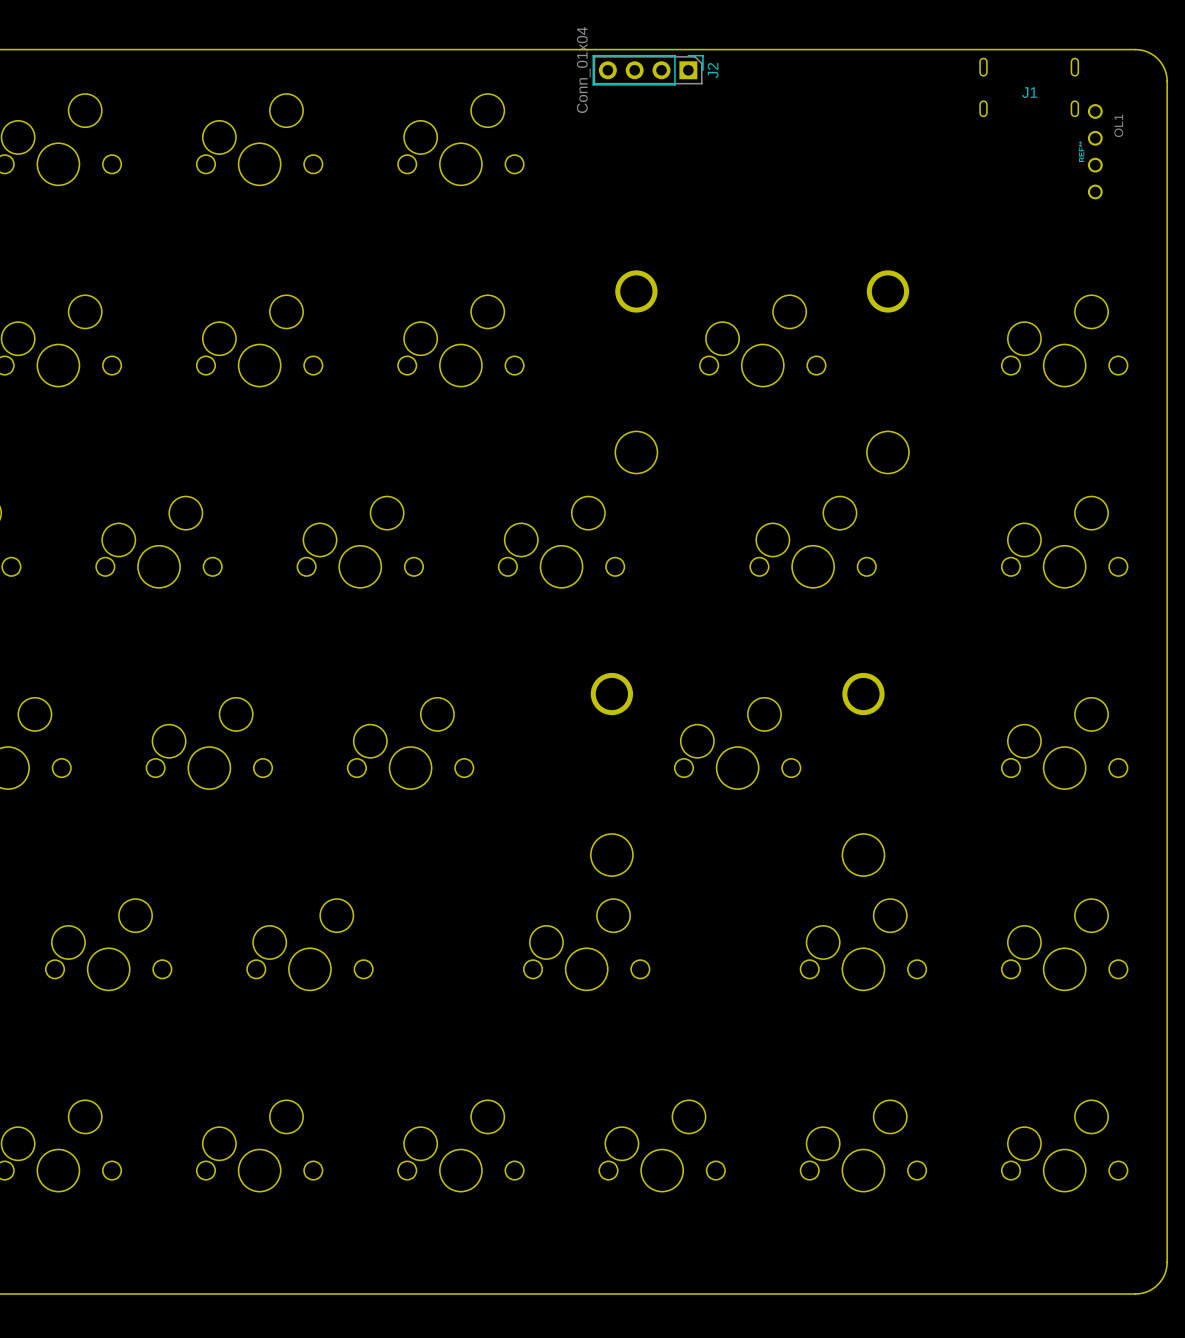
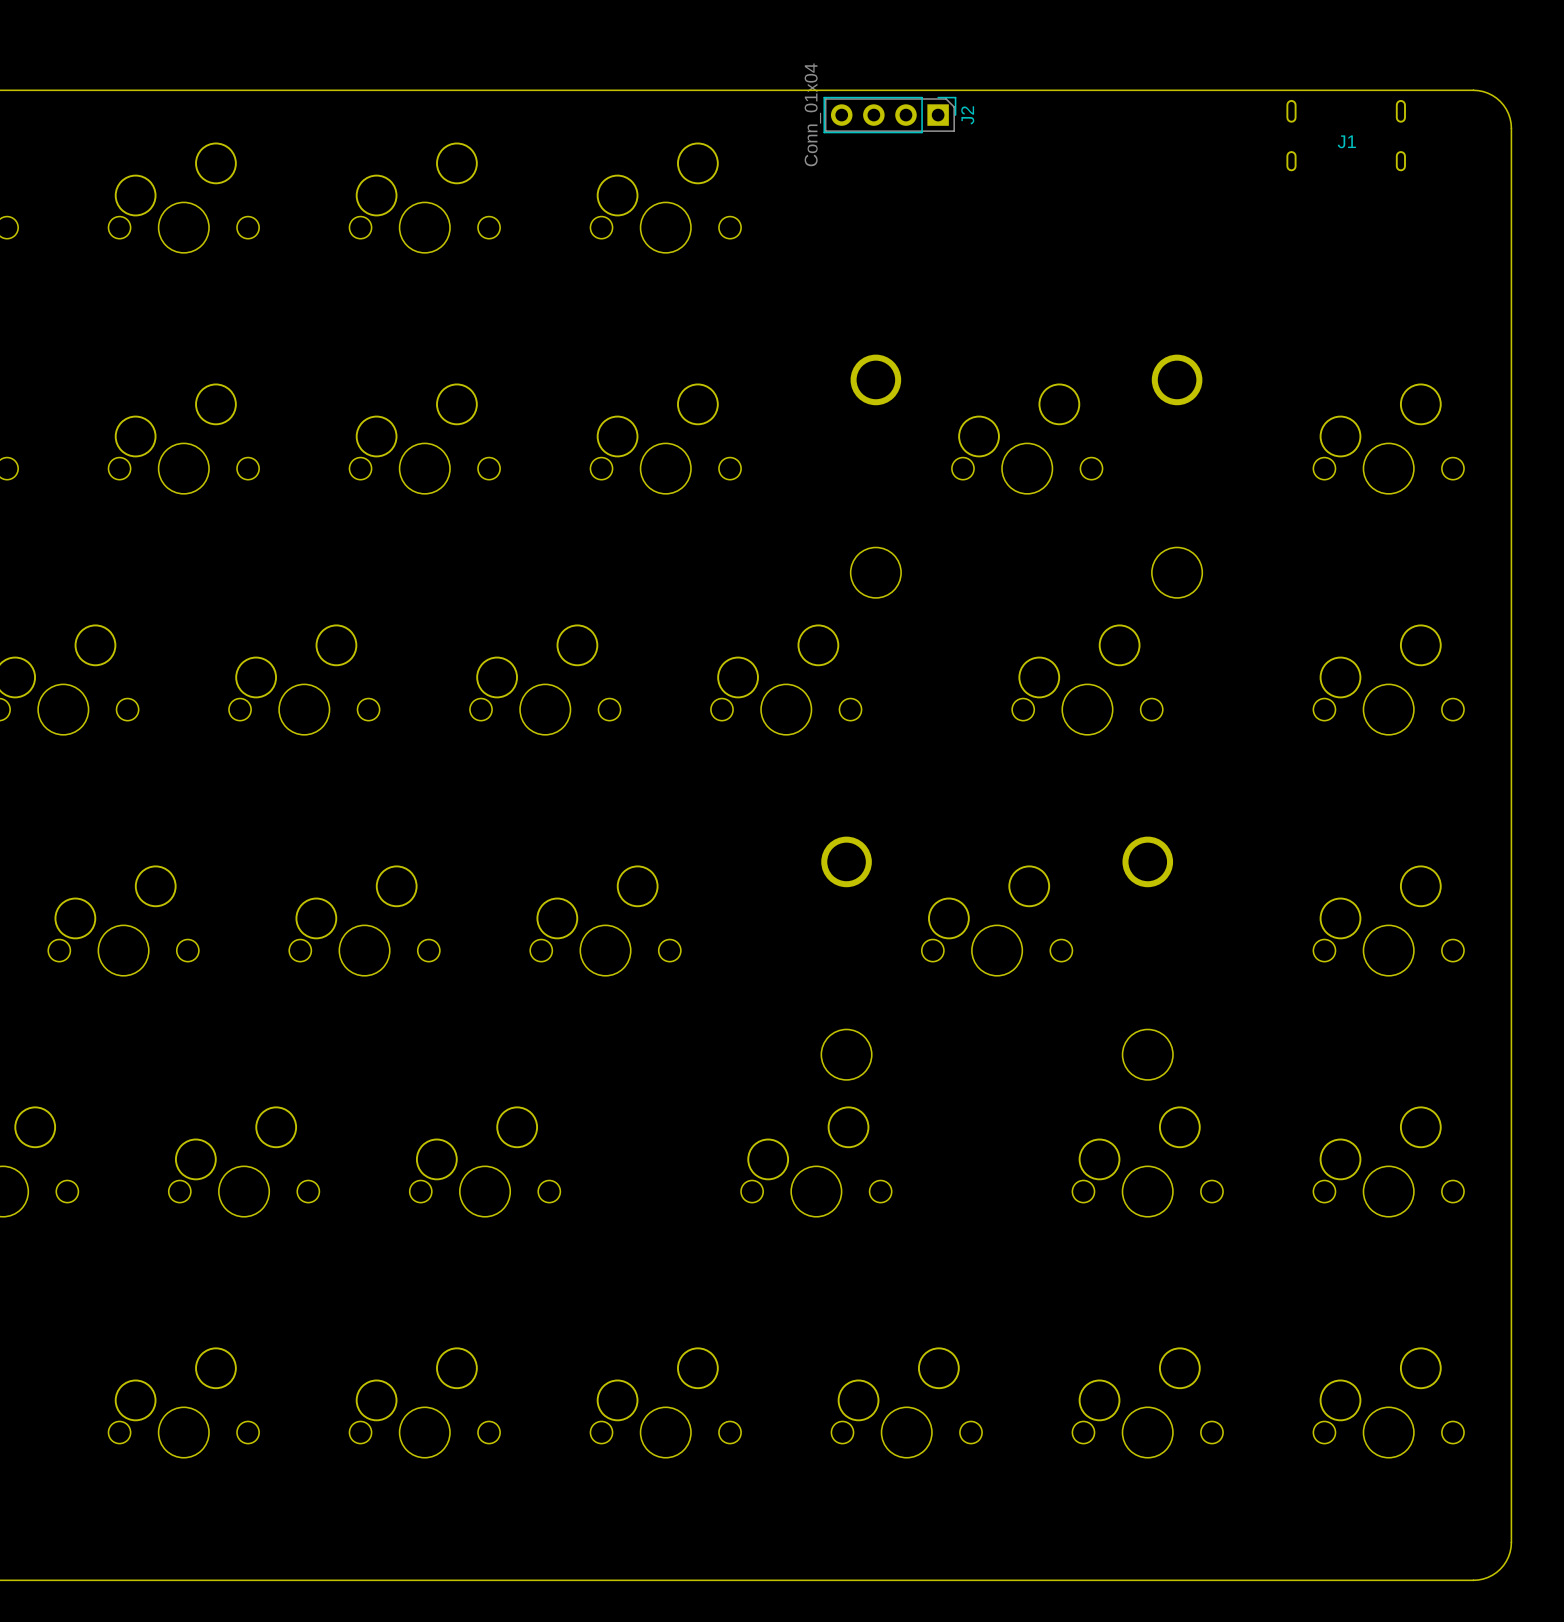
OL1: (1095, 151) -> none

